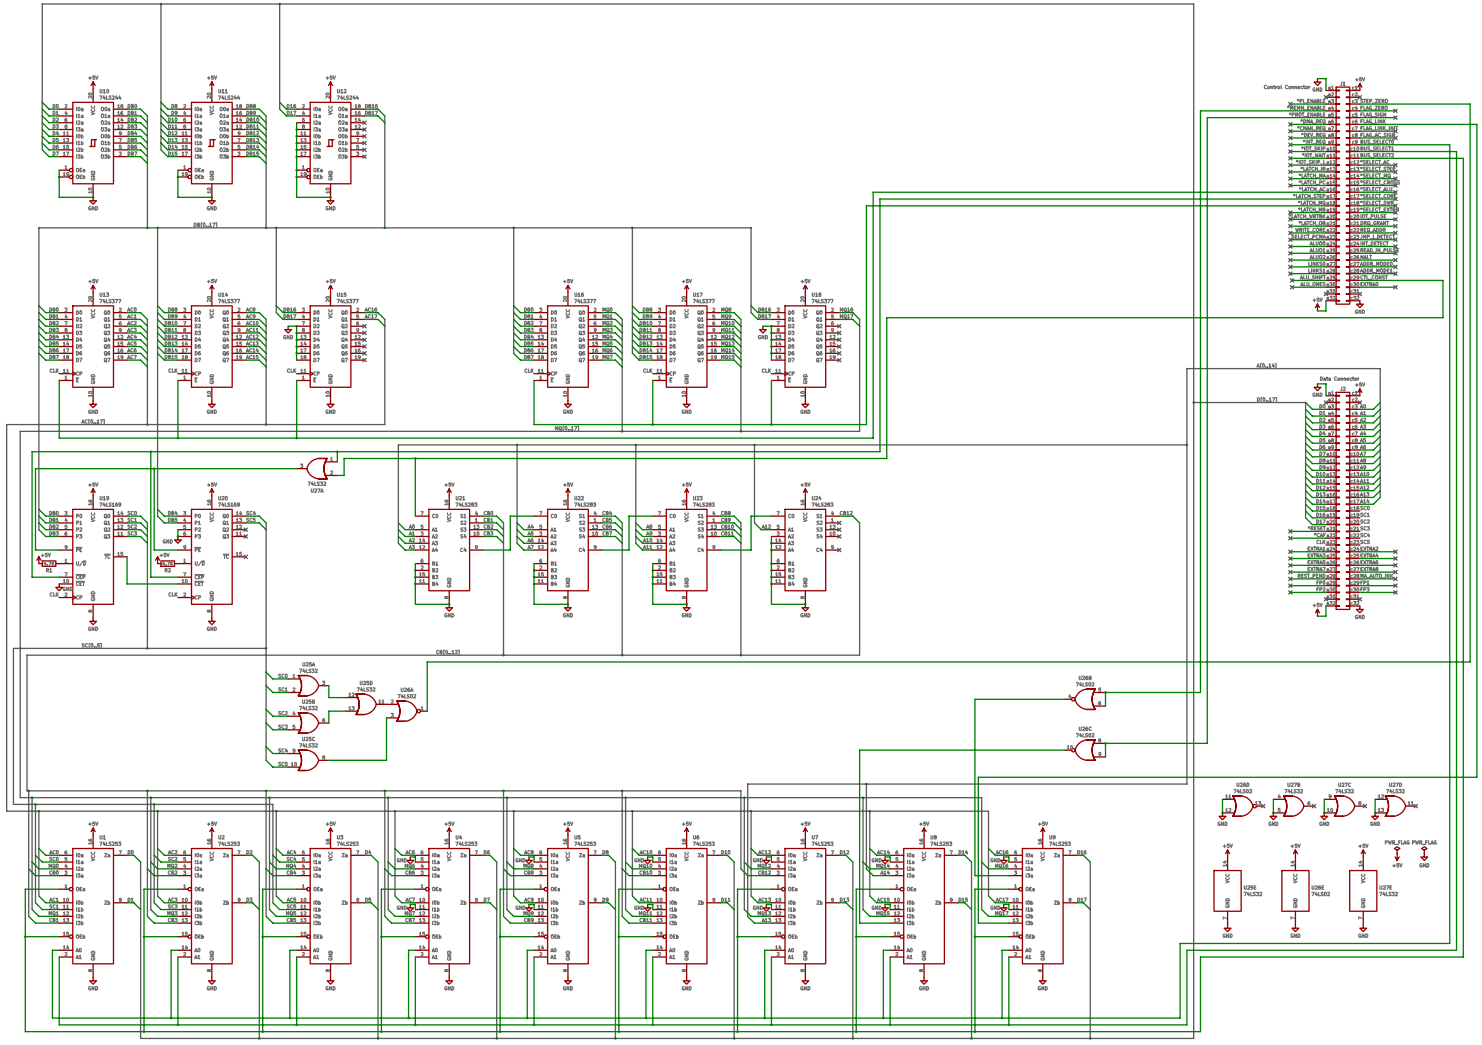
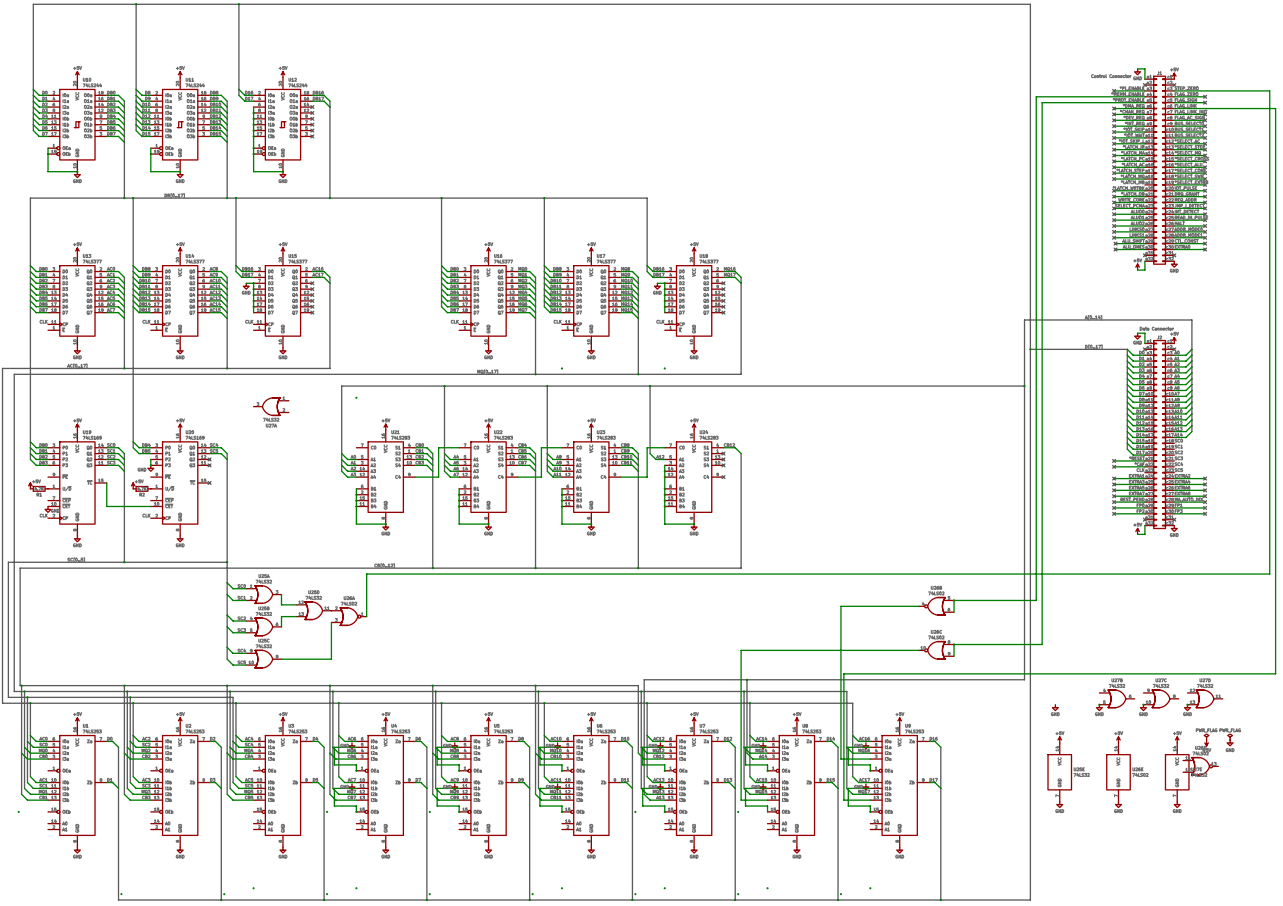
wire: (1395, 144) (1449, 144) (1449, 943) (1180, 943) (1180, 1018) (52, 1018) (52, 950) (59, 950) -> none
no-connect mark: none -> (1205, 126)
wire: (1395, 151) (1456, 151) (1456, 950) (1186, 950) (1186, 1024) (59, 1024) (59, 957) -> none
no-connect mark: none -> (1205, 132)
wire: (1395, 158) (1463, 158) (1463, 957) (1200, 957) (1200, 1031) (25, 1031) (25, 889) (59, 889) -> none
no-connect mark: none -> (1205, 137)
wire: (1290, 192) (873, 192) (873, 438) (59, 438) (59, 380) -> none
no-connect mark: none -> (1114, 167)
wire: (1290, 199) (879, 199) (879, 451) (32, 451) (32, 577) (59, 577) -> none
no-connect mark: none -> (1114, 173)
wire: (1290, 205) (866, 205) (866, 424) (534, 424) (534, 380) -> none
no-connect mark: none -> (1114, 179)
wire: (1290, 212) (1325, 212) -> none
no-connect mark: (1290, 212) -> none
wire: (1395, 280) (1442, 280) (1442, 317) (886, 317) (886, 458) (344, 458) (344, 475) (337, 475) -> none
no-connect mark: none -> (1205, 243)
wire: (177, 380) (177, 438) -> none
wire: (296, 380) (296, 438) -> none
wire: (652, 380) (652, 424) -> none
wire: (771, 380) (771, 424) -> none
wire: (150, 451) (150, 577) (177, 577) -> none
wire: (337, 451) (337, 461) -> none
wire: (415, 458) (415, 516) -> none
wire: (154, 468) (154, 550) (177, 550) -> none
wire: (296, 468) (35, 468) (35, 550) (59, 550) -> none
wire: (1222, 799) (1222, 812) -> none
wire: (1273, 799) (1273, 812) -> none
wire: (1324, 799) (1324, 812) -> none
wire: (1375, 799) (1375, 812) -> none
part position: (1242, 806) -> (1200, 766)
no-connect mark: (1263, 806) -> none
no-connect mark: (1314, 806) -> none
no-connect mark: (1364, 806) -> none
no-connect mark: (1415, 806) -> none
junction: (1222, 812) -> none
wire: (410, 856) (415, 856) (415, 862) -> (356, 770) (356, 764) (334, 764) (334, 747) (356, 747)
wire: (528, 856) (534, 856) (534, 862) -> (459, 770) (459, 764) (437, 764) (437, 747) (459, 747)
wire: (647, 856) (652, 856) (652, 862) -> (561, 770) (561, 764) (539, 764) (539, 747) (561, 747)
wire: (766, 856) (771, 856) (771, 862) -> (664, 770) (664, 764) (642, 764) (642, 747) (664, 747)
wire: (885, 856) (890, 856) (890, 862) -> (767, 770) (767, 764) (745, 764) (745, 747) (767, 747)
wire: (1003, 856) (1008, 856) (1008, 862) -> (870, 770) (870, 764) (848, 764) (848, 747) (870, 747)
wire: (177, 889) (144, 889) (144, 1031) -> none
wire: (296, 889) (262, 889) (262, 1031) -> none
wire: (415, 889) (381, 889) (381, 1031) -> none
junction: none -> (356, 770)
wire: (534, 889) (500, 889) (500, 1031) -> none
junction: none -> (459, 770)
wire: (652, 889) (618, 889) (618, 1031) -> none
junction: none -> (561, 770)
wire: (771, 889) (737, 889) (737, 1031) -> none
junction: none -> (664, 770)
wire: (890, 889) (856, 889) (856, 1031) -> none
junction: none -> (767, 770)
wire: (1008, 889) (974, 889) (974, 1031) -> none
junction: none -> (870, 770)
wire: (410, 904) (415, 904) (415, 909) -> (356, 811) (356, 806) (334, 806) (334, 788) (356, 788)
wire: (528, 904) (534, 904) (534, 909) -> (459, 811) (459, 806) (437, 806) (437, 788) (459, 788)
wire: (647, 904) (652, 904) (652, 909) -> (561, 811) (561, 806) (539, 806) (539, 788) (561, 788)
wire: (766, 904) (771, 904) (771, 909) -> (664, 811) (664, 806) (642, 806) (642, 788) (664, 788)
wire: (885, 904) (890, 904) (890, 909) -> (767, 811) (767, 806) (745, 806) (745, 788) (767, 788)
wire: (1003, 904) (1008, 904) (1008, 909) -> (870, 811) (870, 806) (848, 806) (848, 788) (870, 788)
wire: (25, 936) (59, 936) -> none
wire: (144, 936) (177, 936) -> none
wire: (262, 936) (296, 936) -> none
wire: (381, 936) (415, 936) -> none
junction: none -> (356, 811)
wire: (500, 936) (534, 936) -> none
junction: none -> (459, 811)
wire: (618, 936) (652, 936) -> none
junction: none -> (561, 811)
wire: (737, 936) (771, 936) -> none
junction: none -> (664, 811)
wire: (856, 936) (890, 936) -> none
wire: (974, 936) (1008, 936) -> none
junction: none -> (870, 811)
wire: (177, 950) (171, 950) (171, 1018) -> none
wire: (296, 950) (289, 950) (289, 1018) -> none
wire: (415, 950) (408, 950) (408, 1018) -> none
wire: (534, 950) (527, 950) (527, 1018) -> none
wire: (652, 950) (645, 950) (645, 1018) -> none
wire: (771, 950) (764, 950) (764, 1018) -> none
wire: (890, 950) (883, 950) (883, 1018) -> none
wire: (1008, 950) (1002, 950) (1002, 1018) -> none
wire: (177, 957) (177, 1024) -> none
wire: (296, 957) (296, 1024) -> none
wire: (415, 957) (415, 1024) -> none
wire: (534, 957) (534, 1024) -> none
wire: (652, 957) (652, 1024) -> none
wire: (771, 957) (771, 1024) -> none
wire: (890, 957) (890, 1024) -> none
wire: (1008, 957) (1008, 1024) -> none

